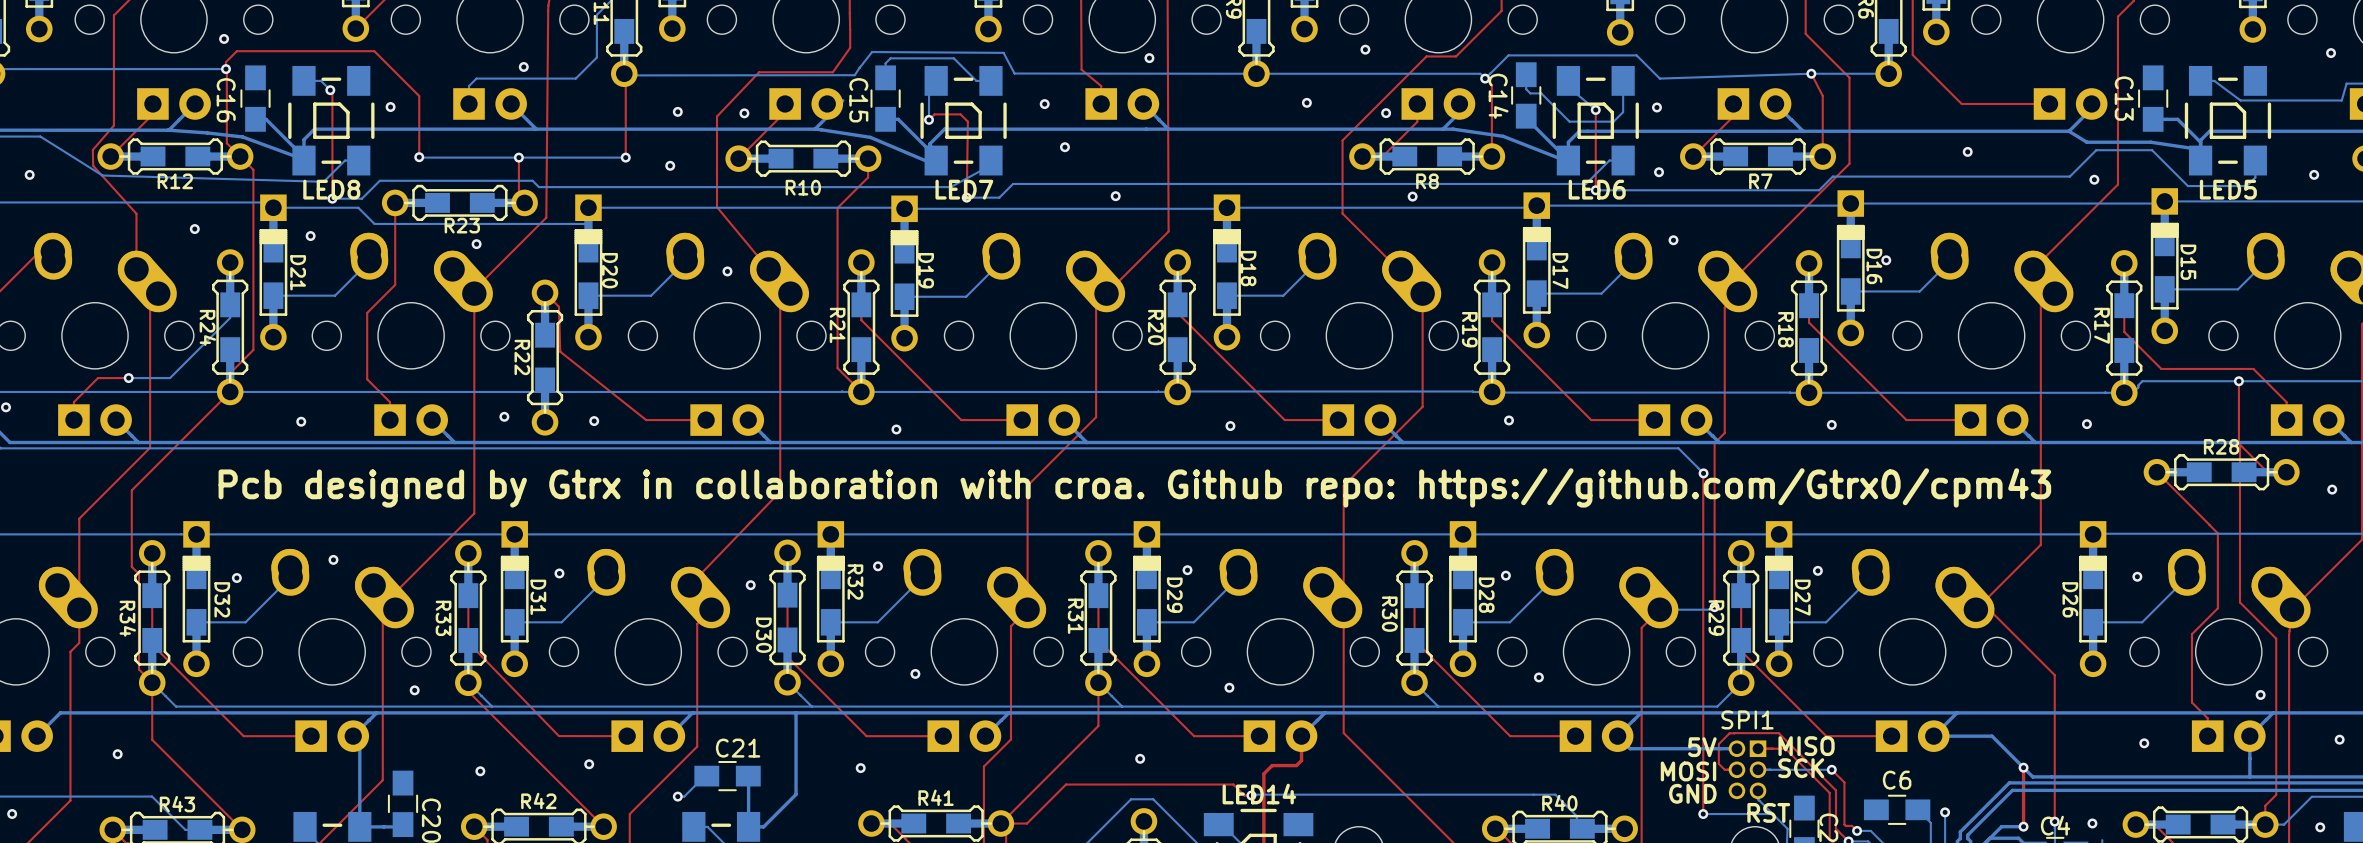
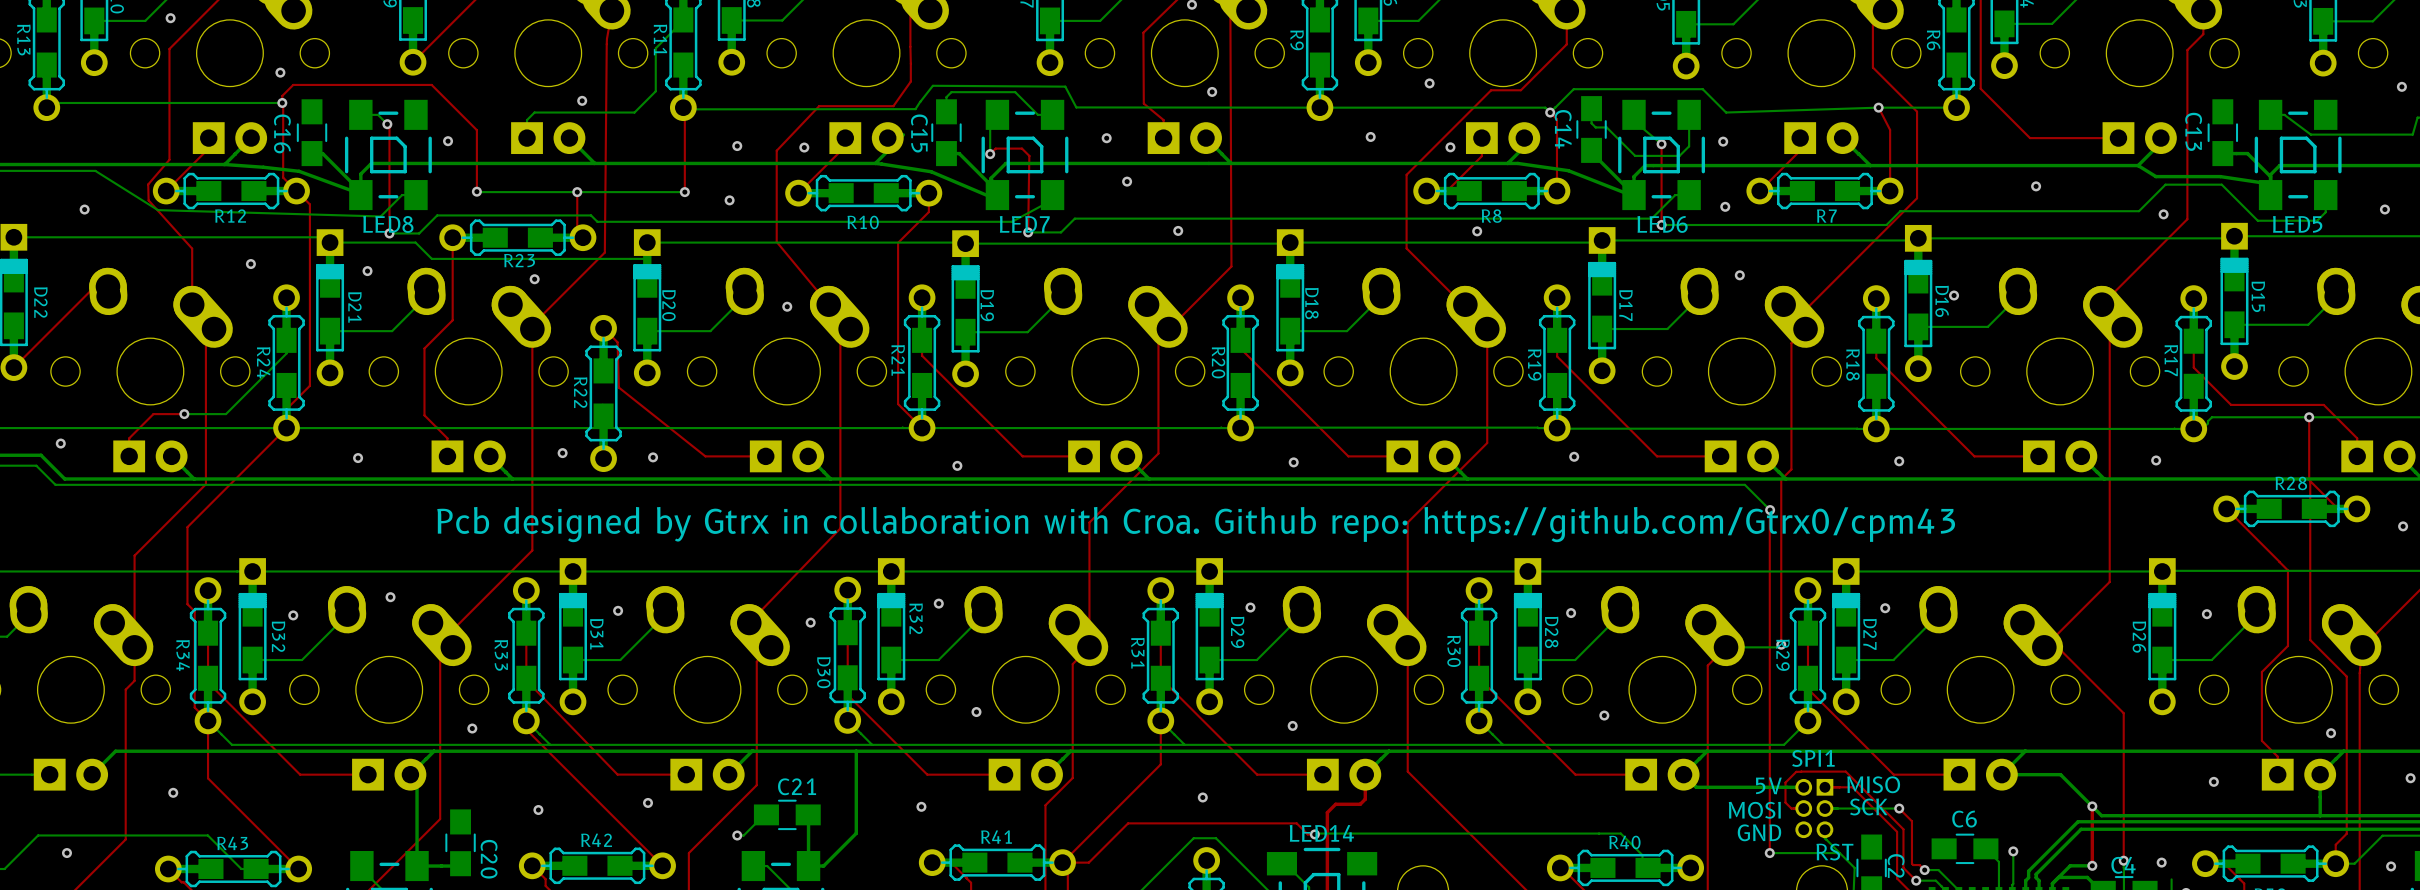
text: Pcb designed by Gtrx in collaboration with croa. Github repo: https://github.com/Gtrx0/cpm43 (1134, 487) -> Pcb designed by Gtrx in collaboration with Croa. Github repo: https://github.com/Gtrx0/cpm43 (1196, 524)

